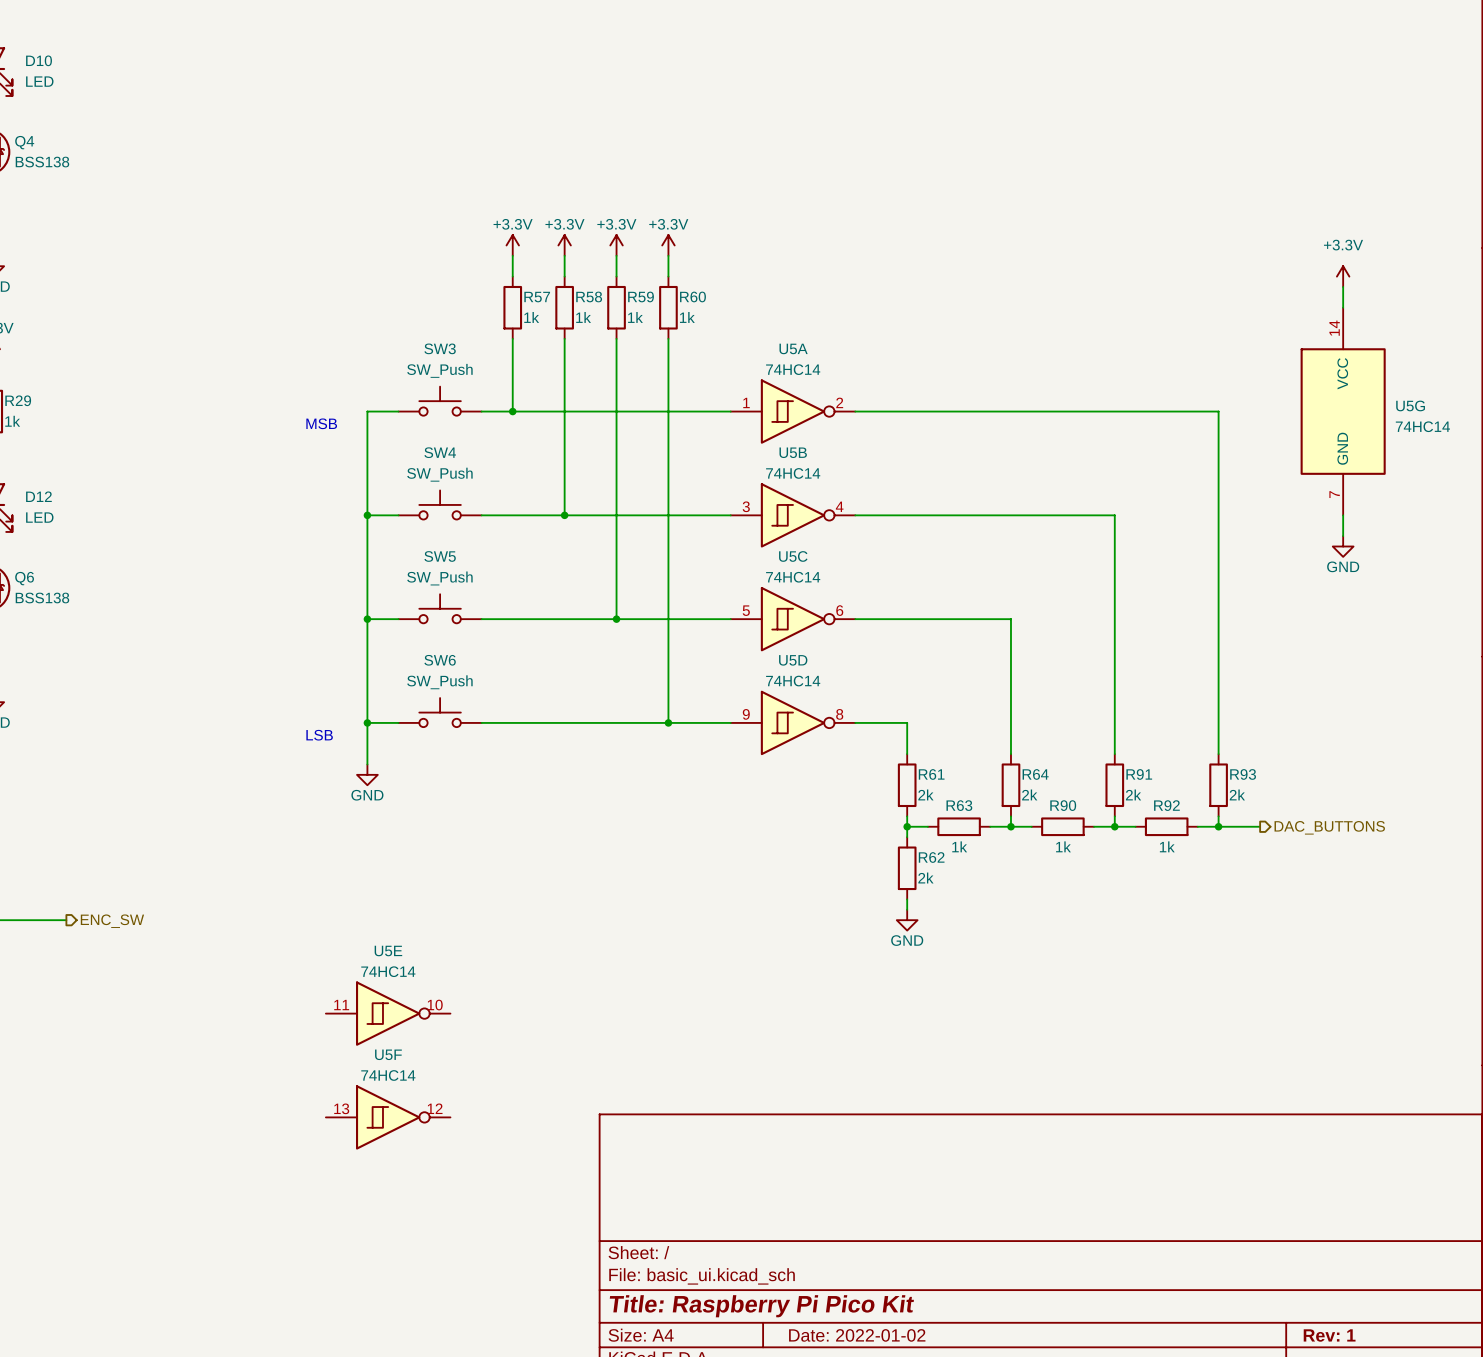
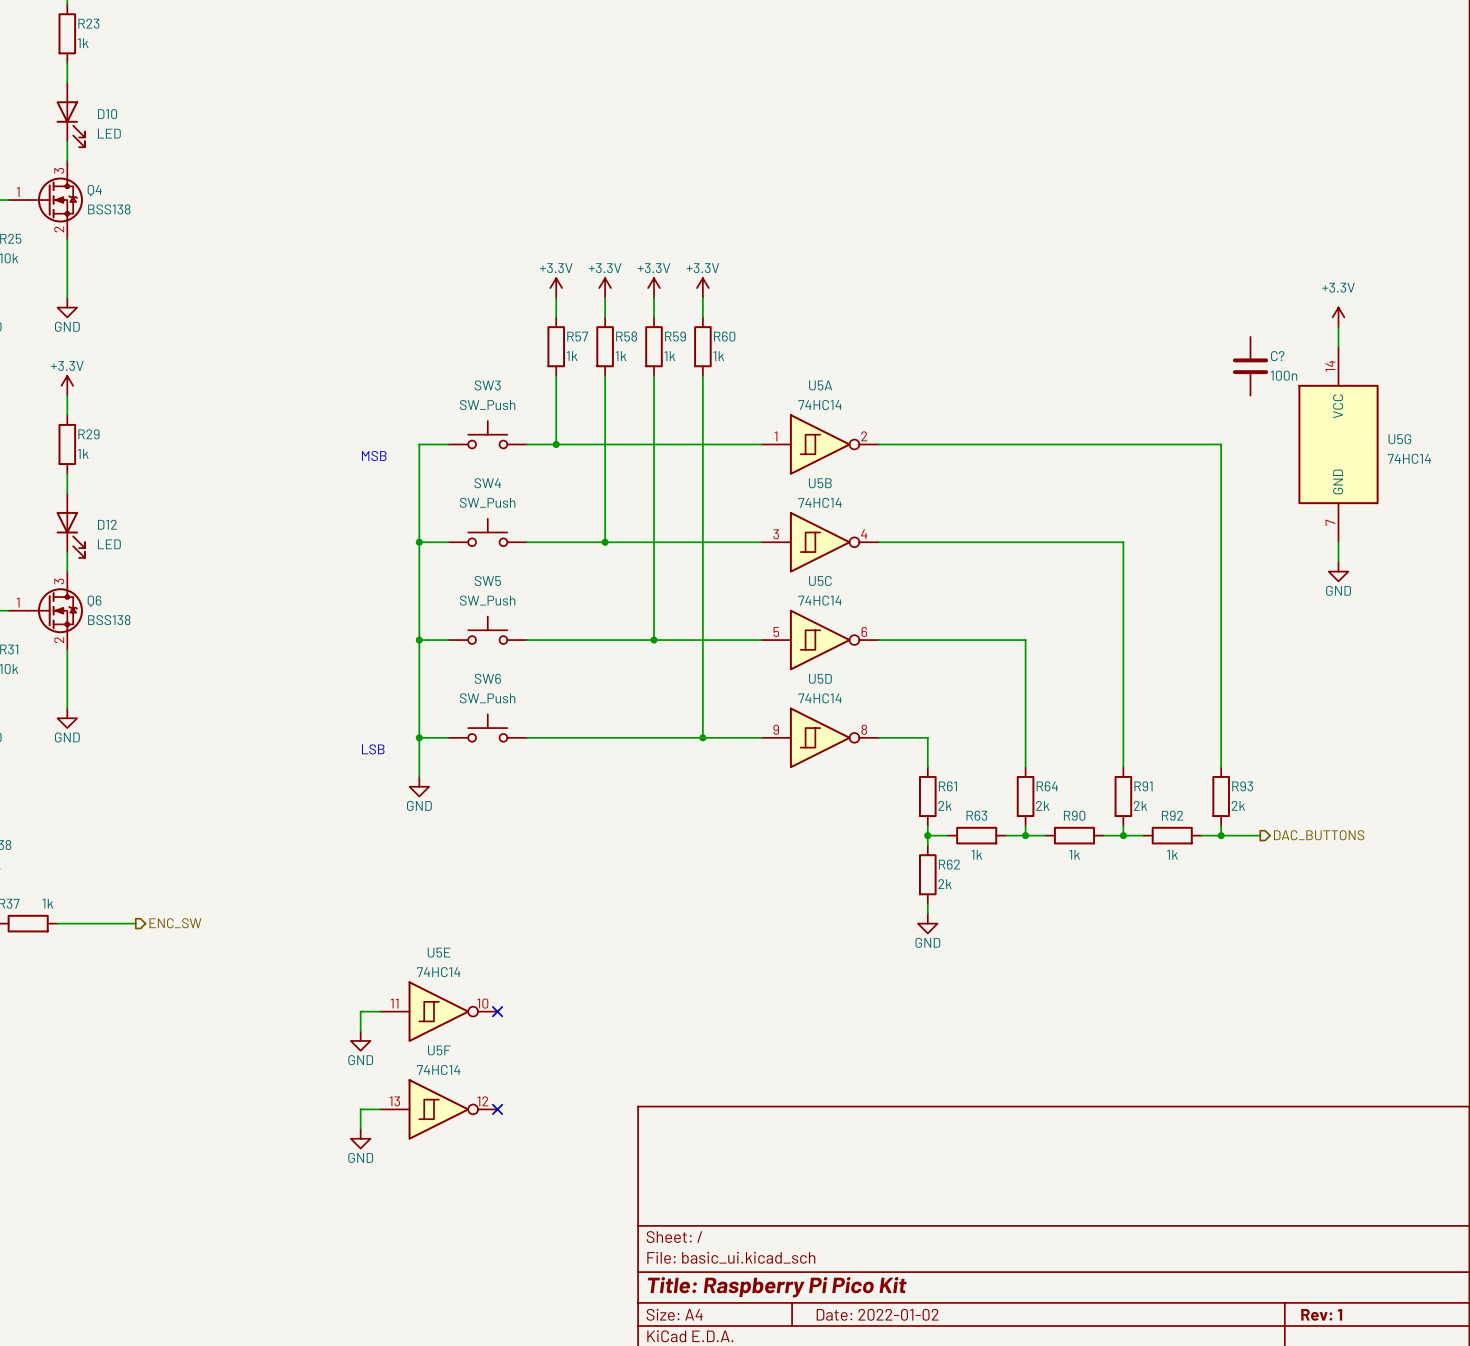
C?: none -> 100n (1250, 366)
wire: none -> (380, 1011) (360, 1011) (360, 1031)
no-connect mark: none -> (497, 1011)
power symbol: none -> GND (360, 1040)
wire: none -> (380, 1109) (360, 1109) (360, 1128)
no-connect mark: none -> (497, 1109)
power symbol: none -> GND (360, 1138)

